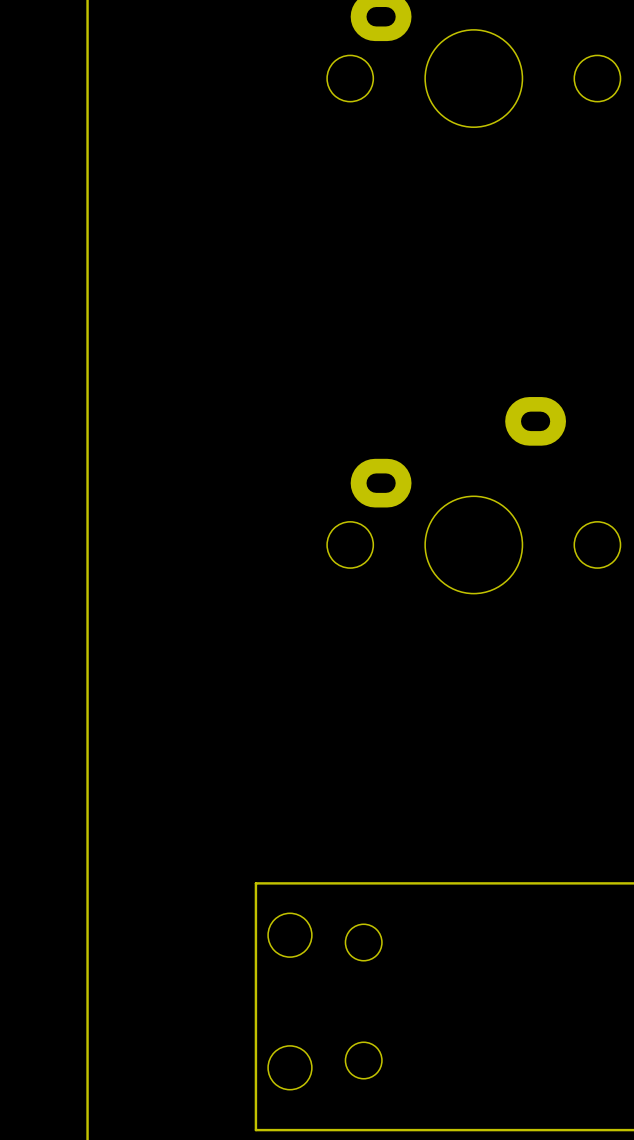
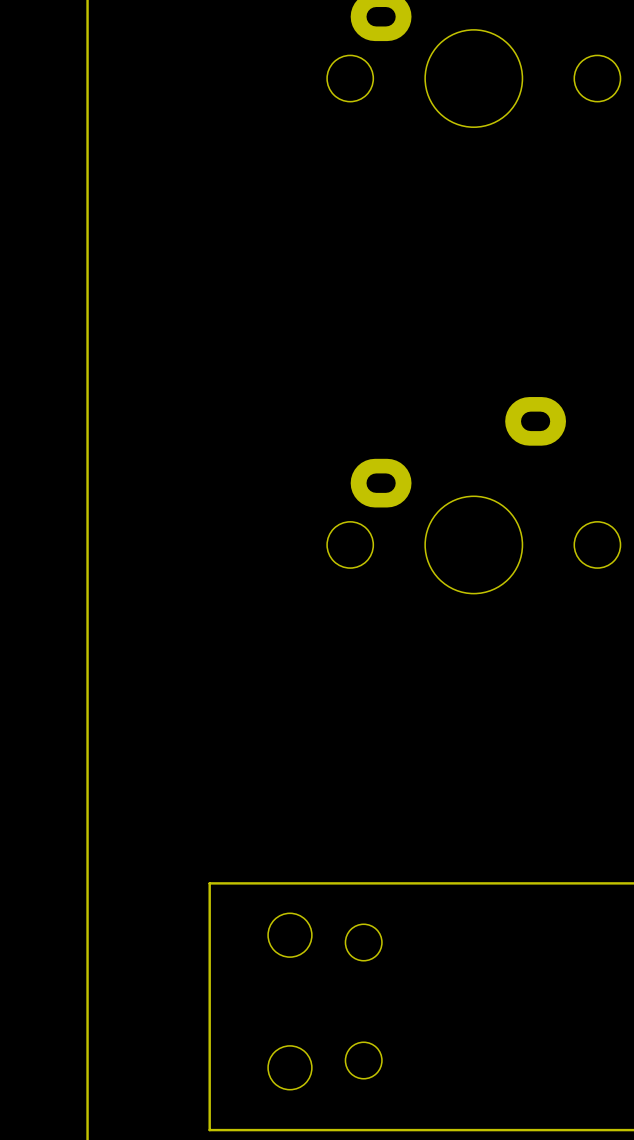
board edge: (255, 883) (255, 1130) -> (255, 883) (209, 883) (209, 1130) (255, 1130)

